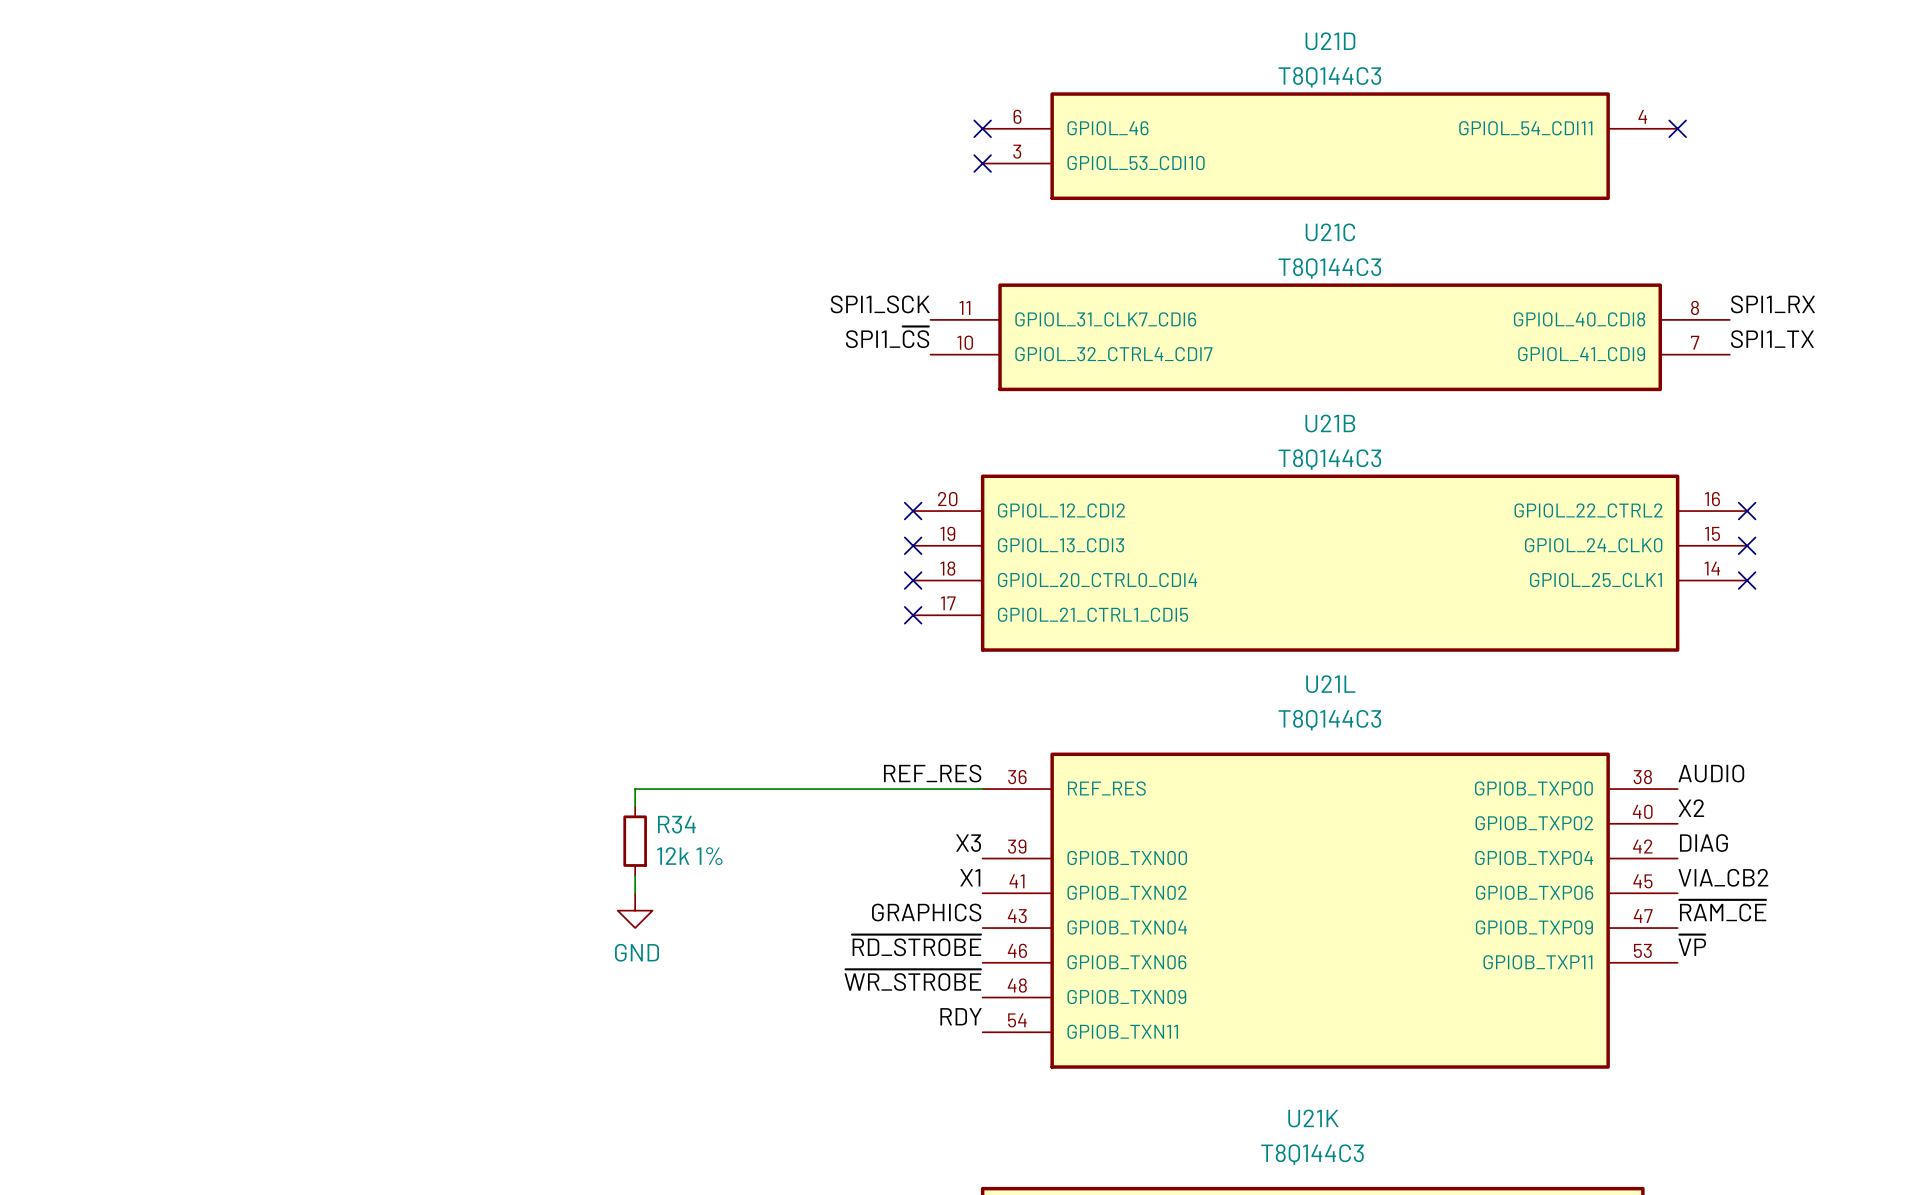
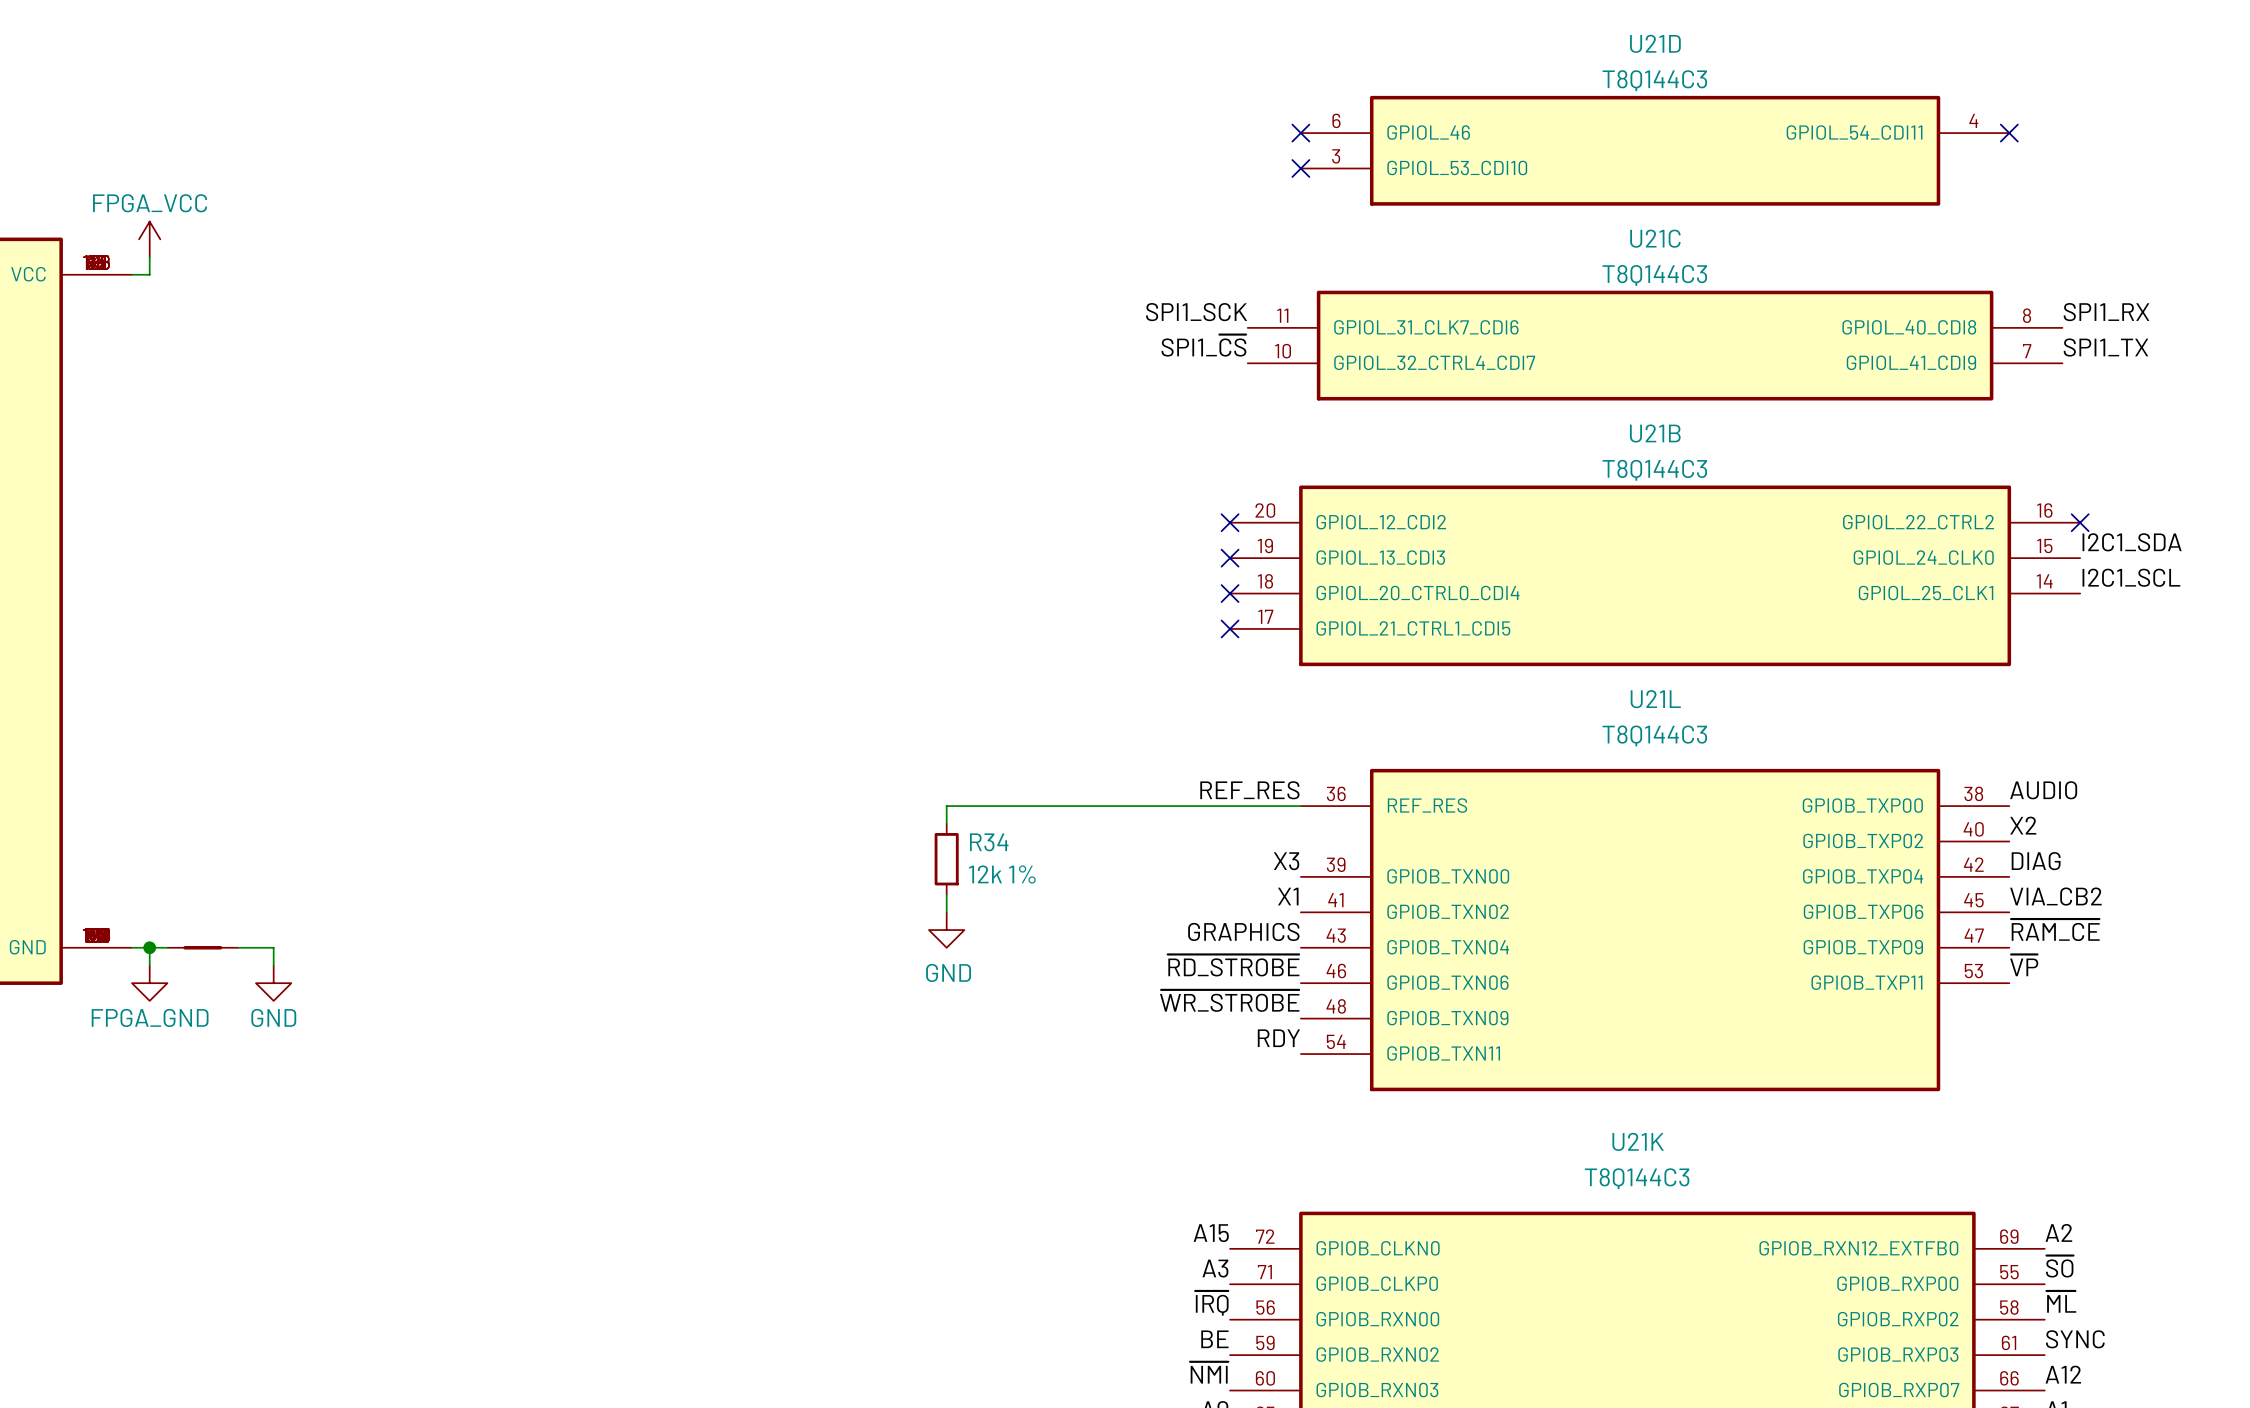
label: none -> I2C1_SDA (2132, 542)
no-connect mark: (1747, 545) -> none
label: none -> I2C1_SCL (2131, 577)
no-connect mark: (1747, 580) -> none

